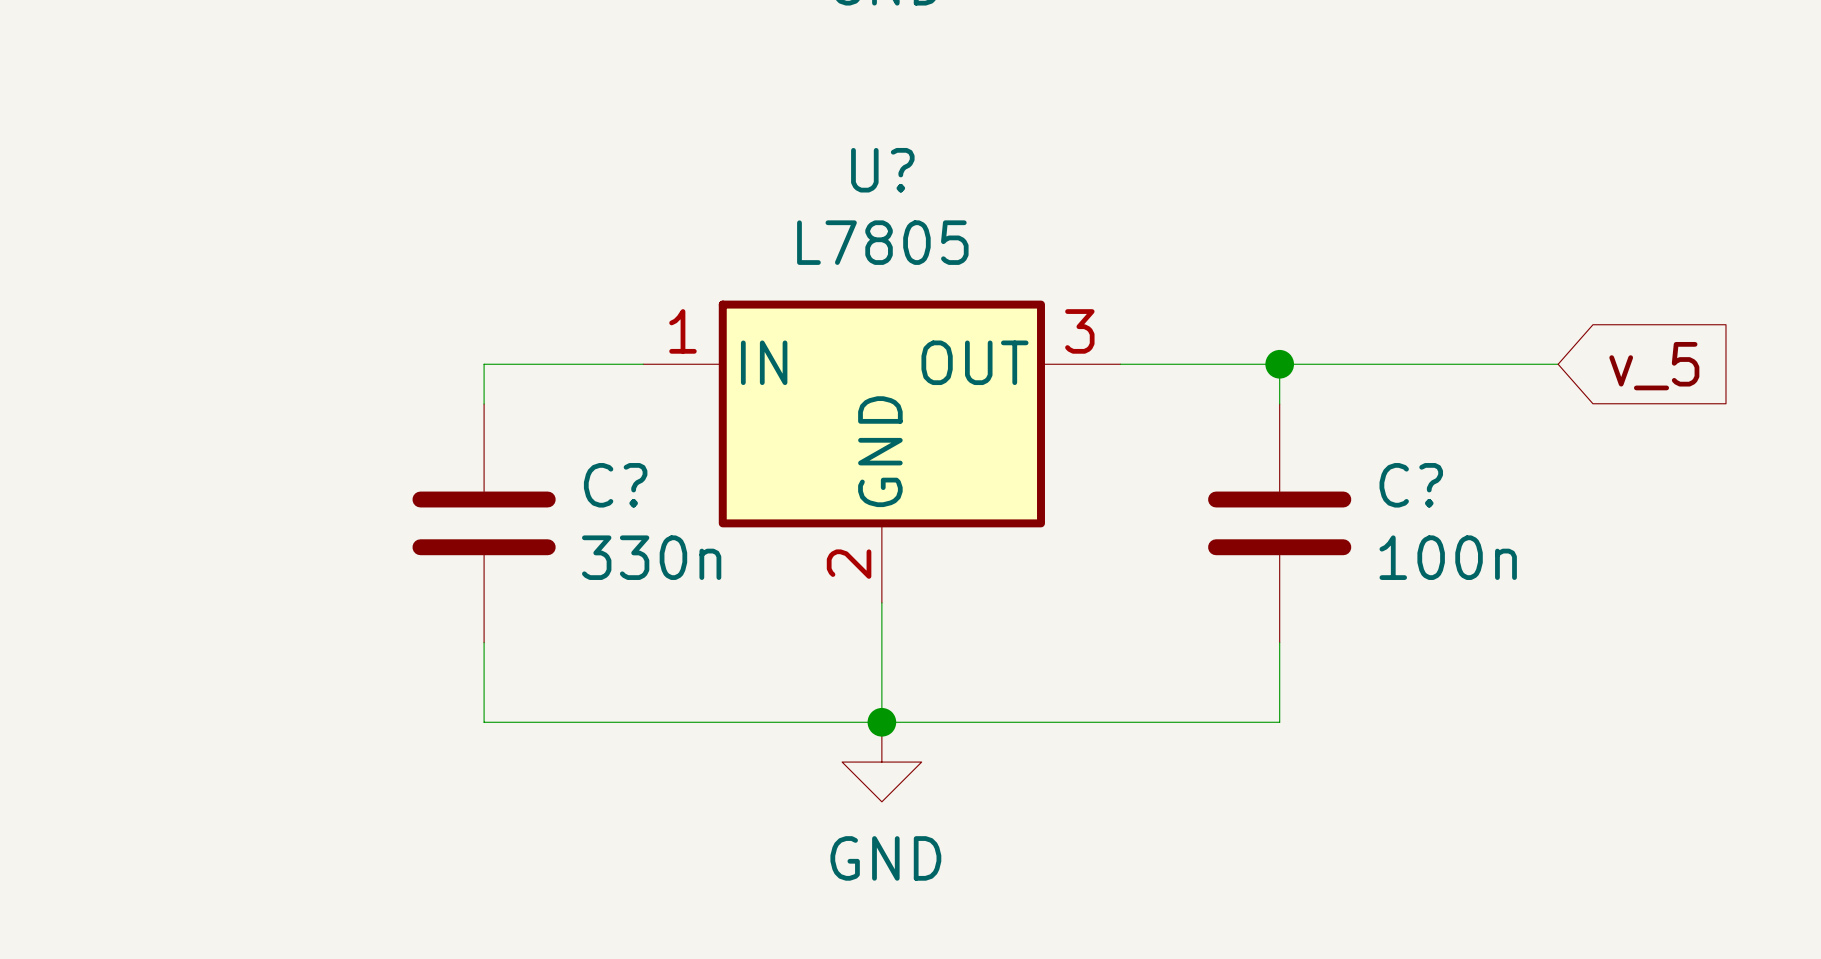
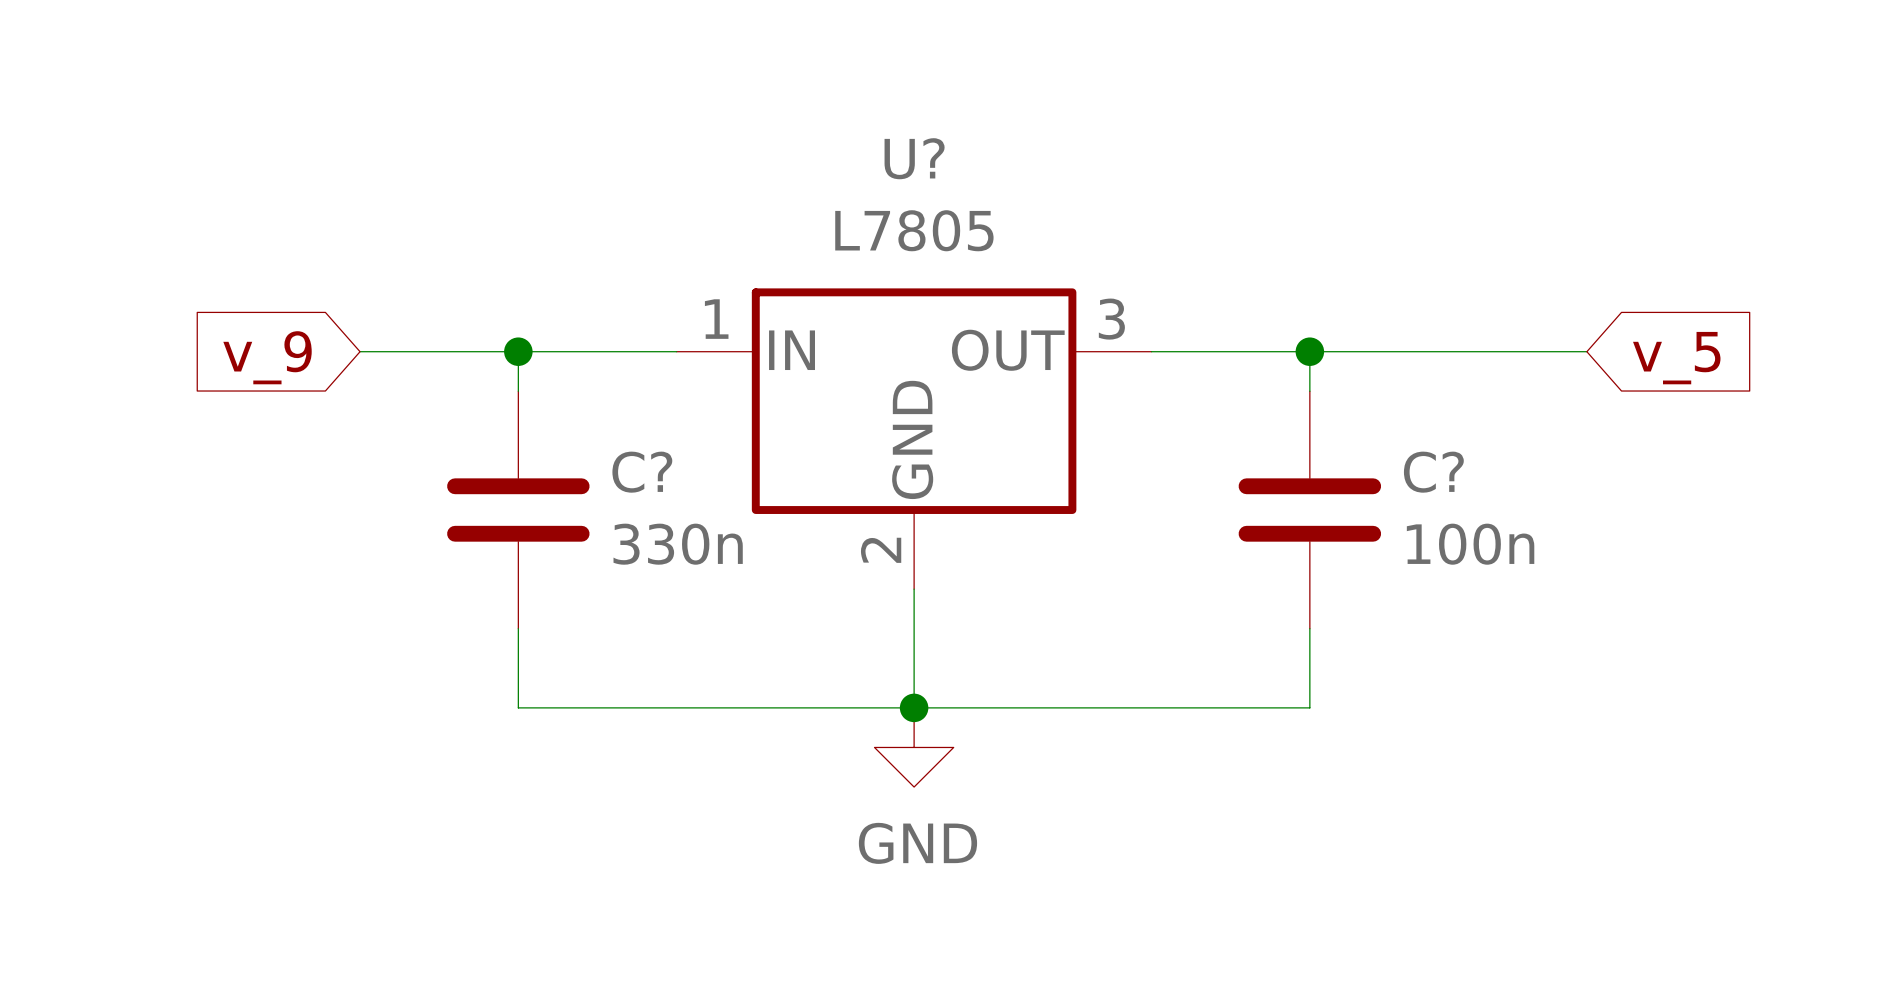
wire: none -> (360, 351) (518, 351)
junction: none -> (518, 351)
global label: none -> v_9 (267, 357)

